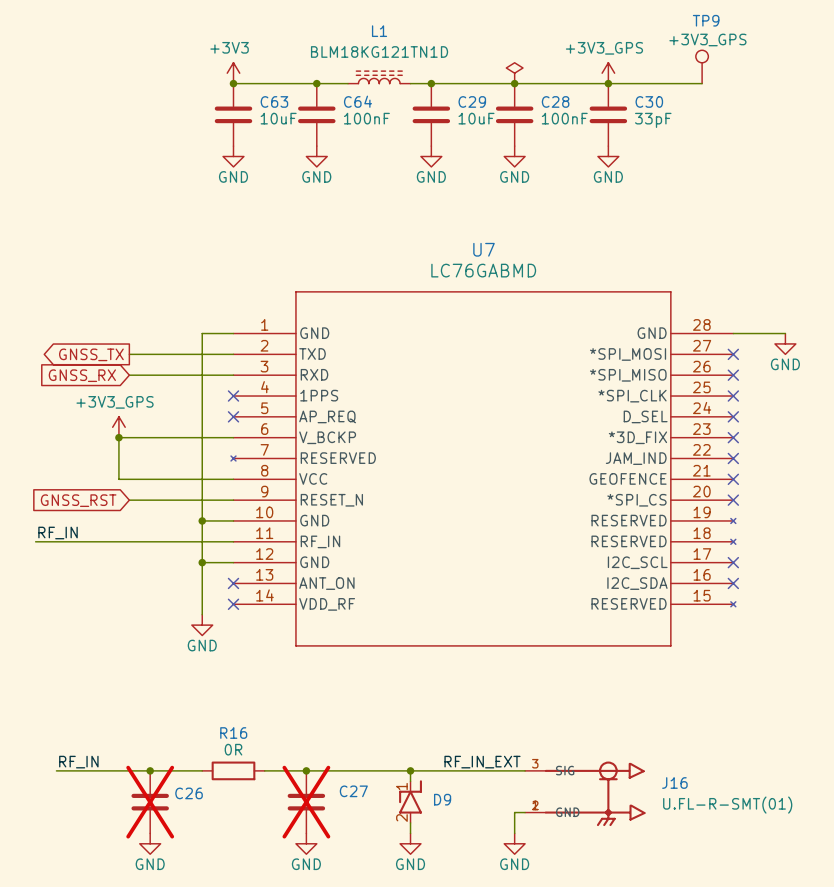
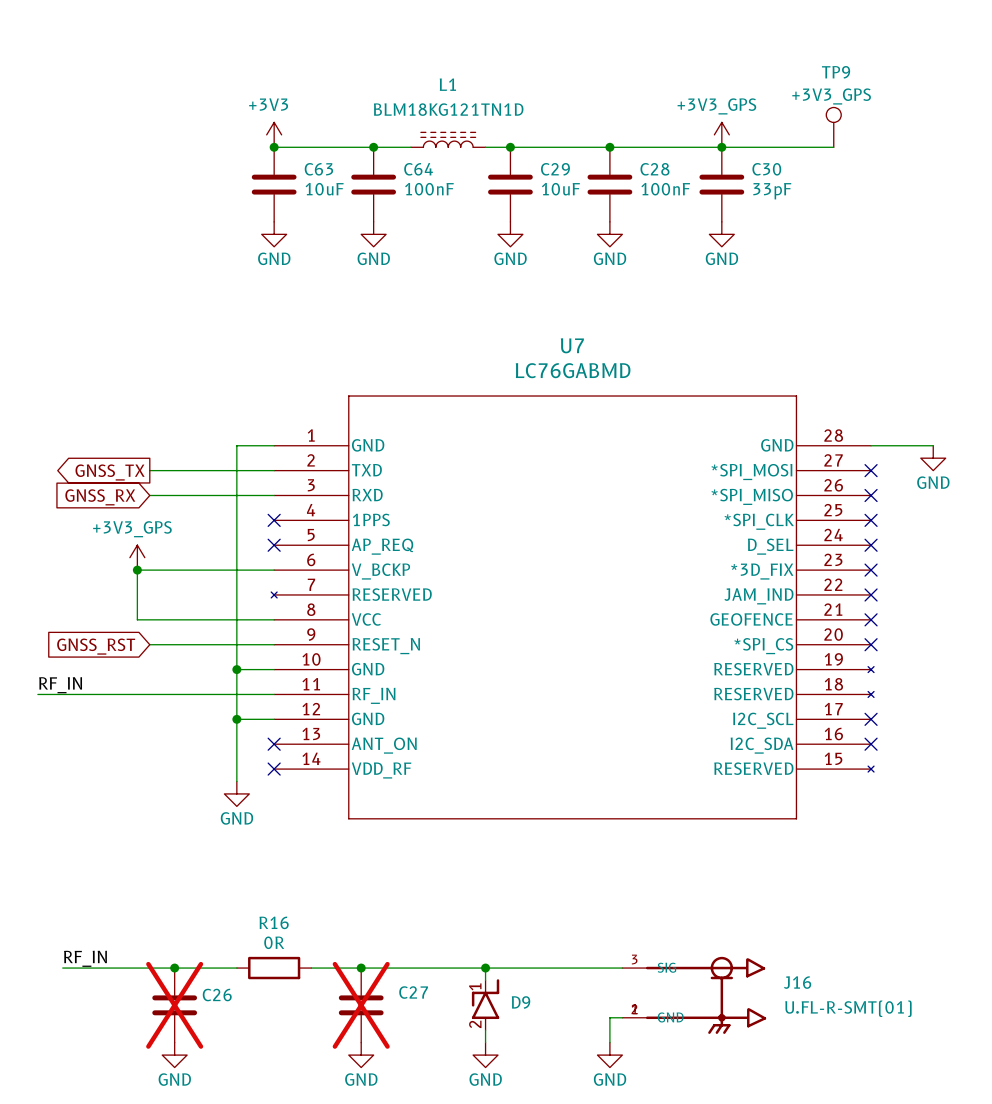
power symbol: (514, 73) -> none
label: RF_IN_EXT (482, 762) -> none

